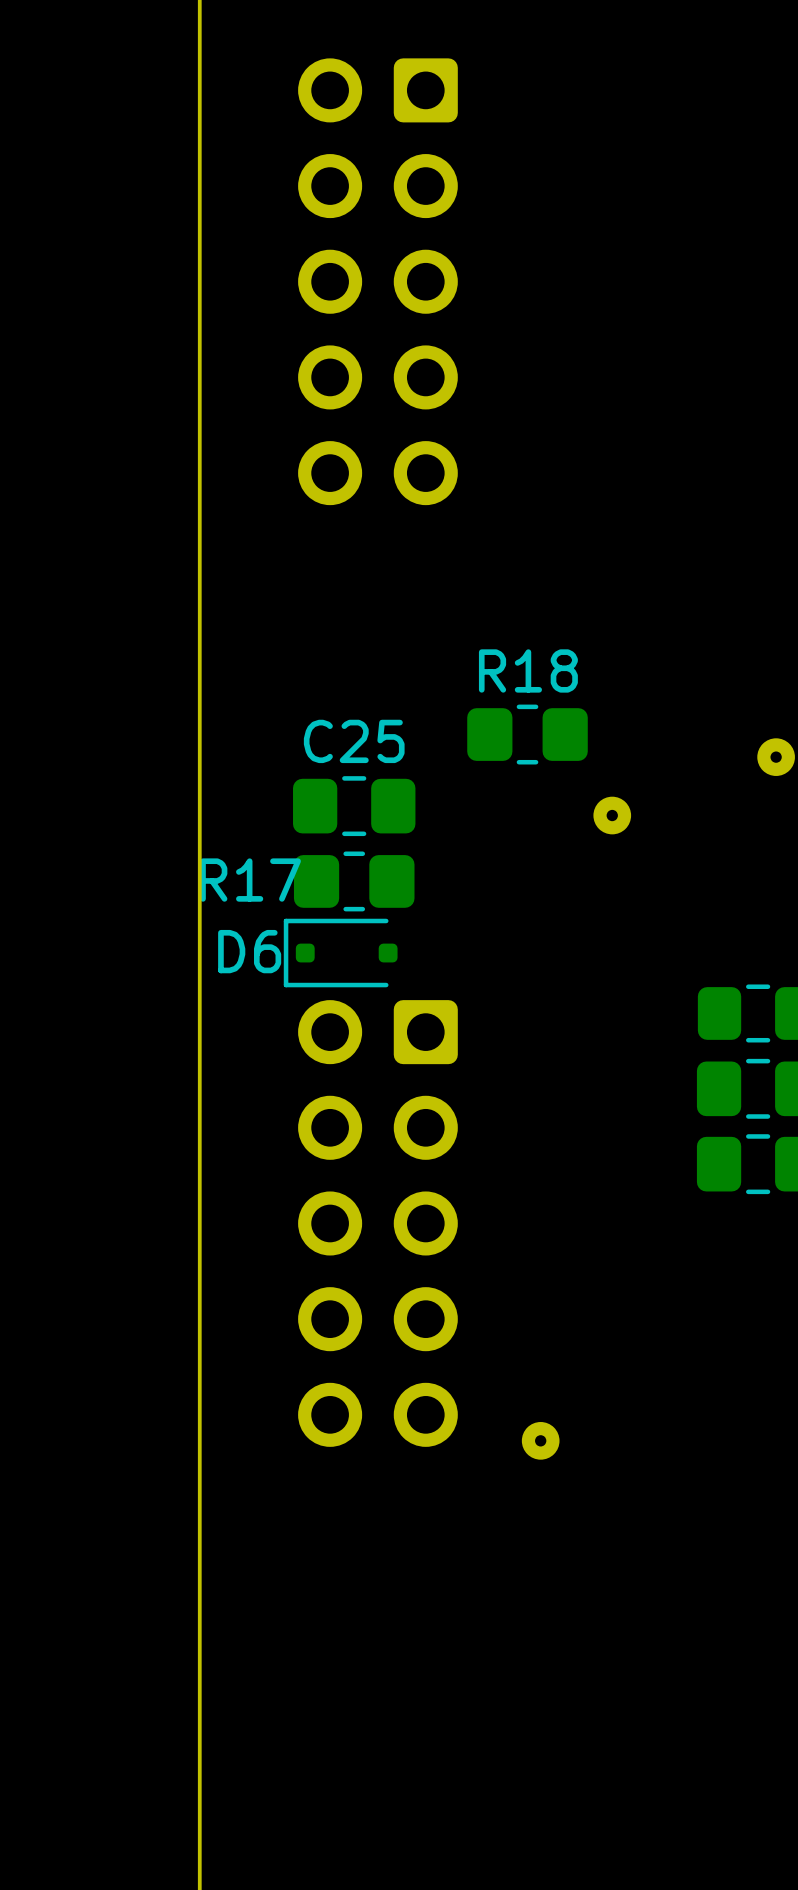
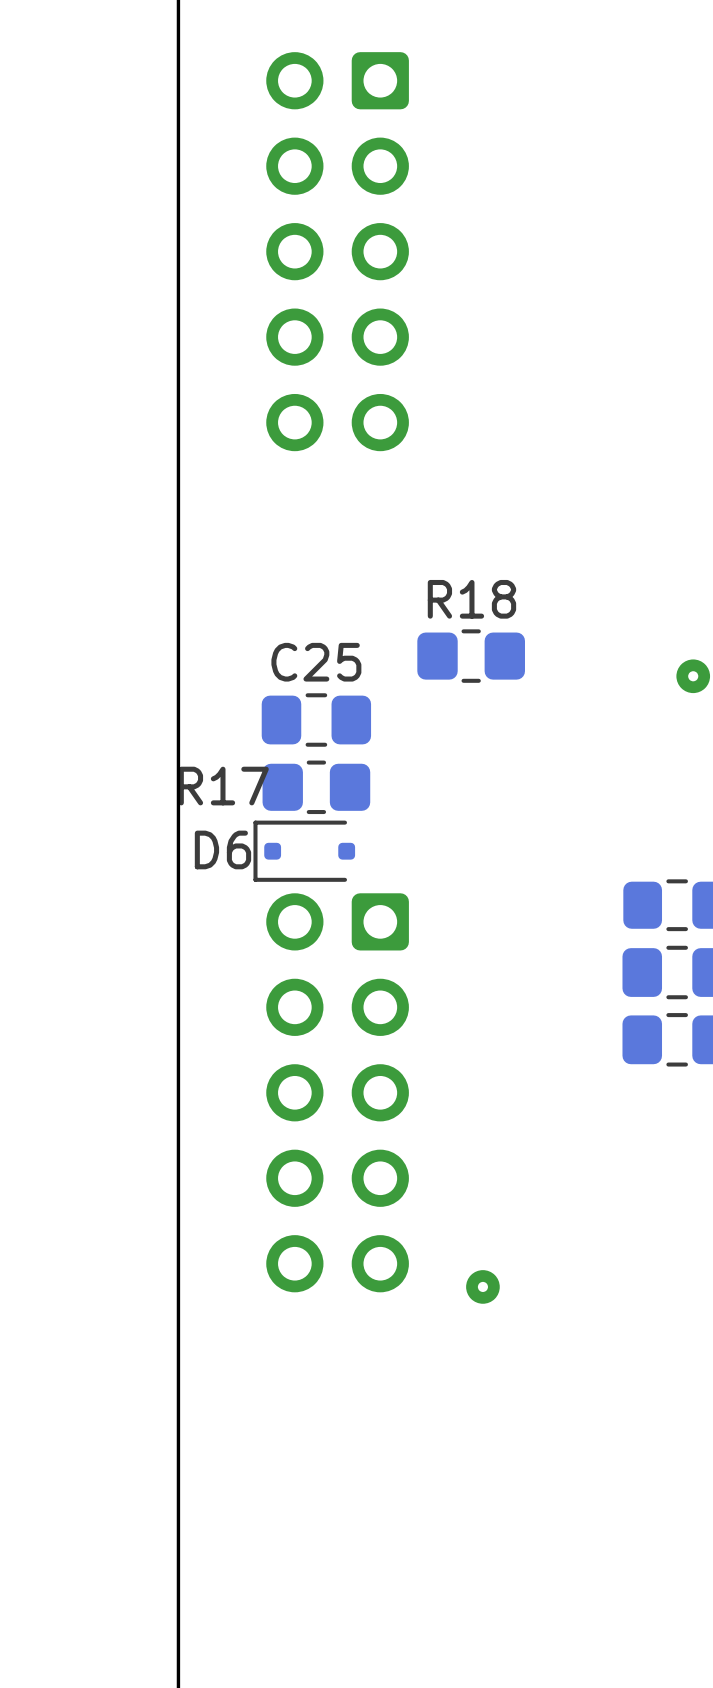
part: (612, 815) -> none

